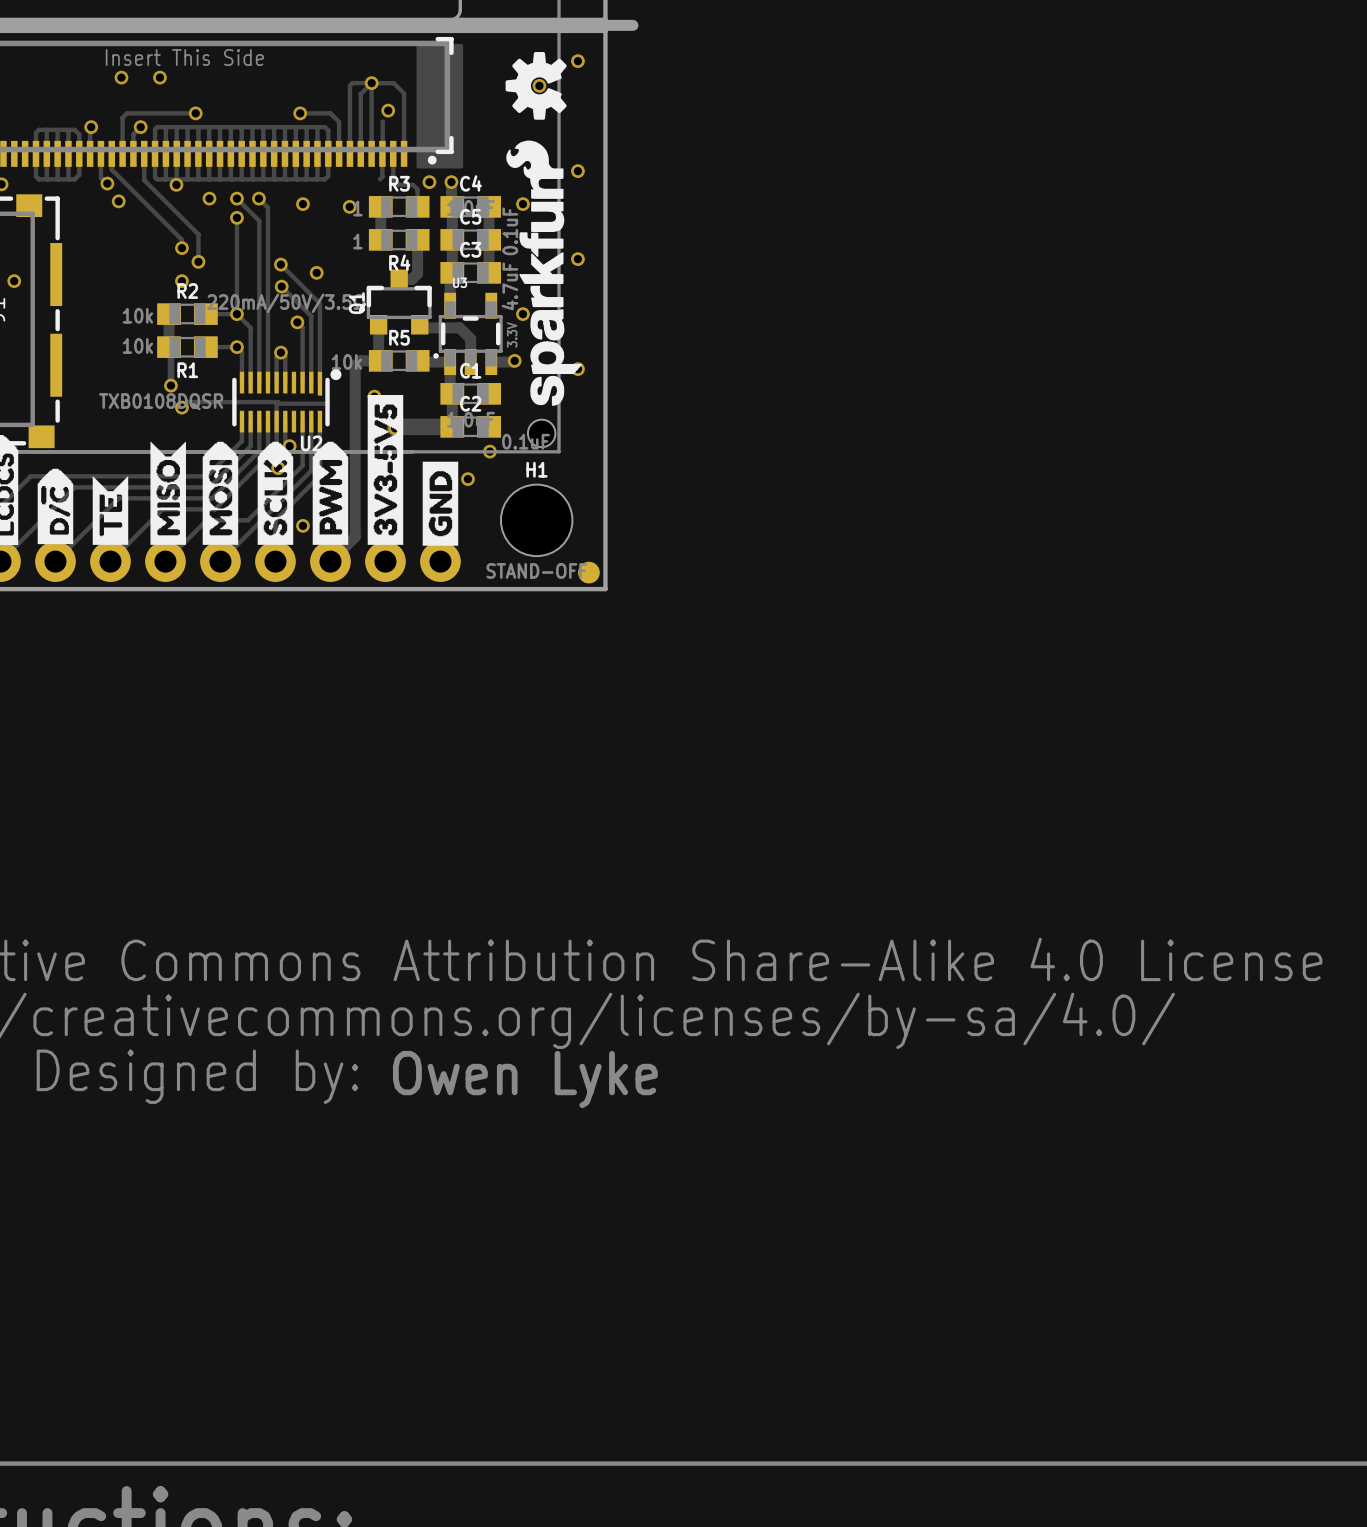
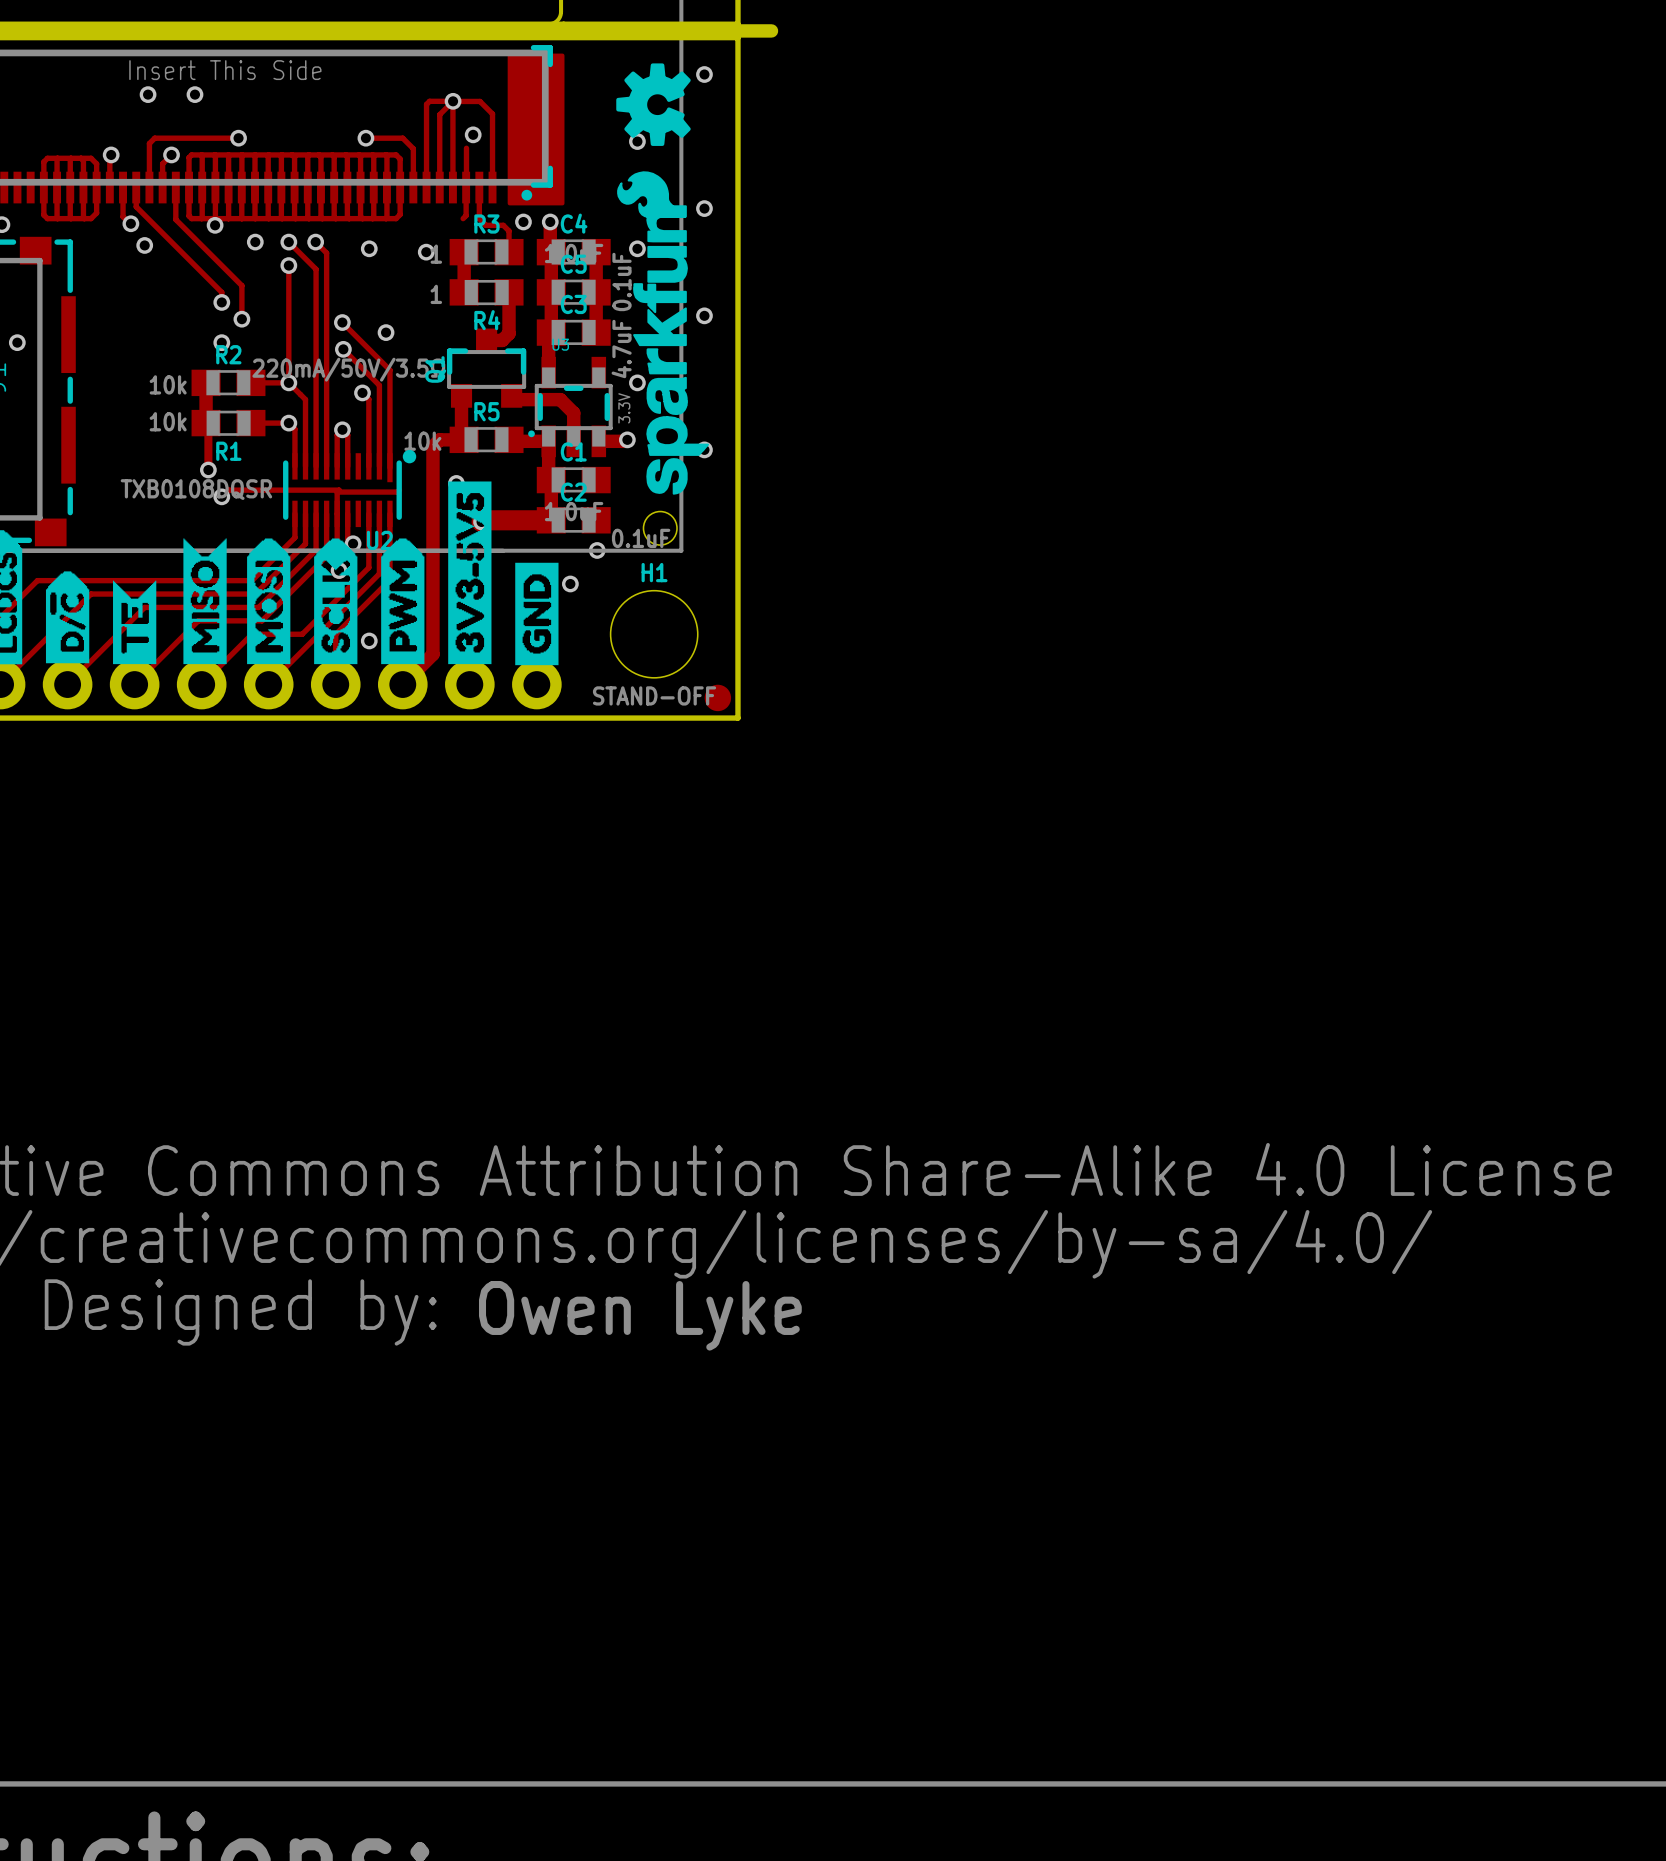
via position: (539, 85) -> (637, 141)

